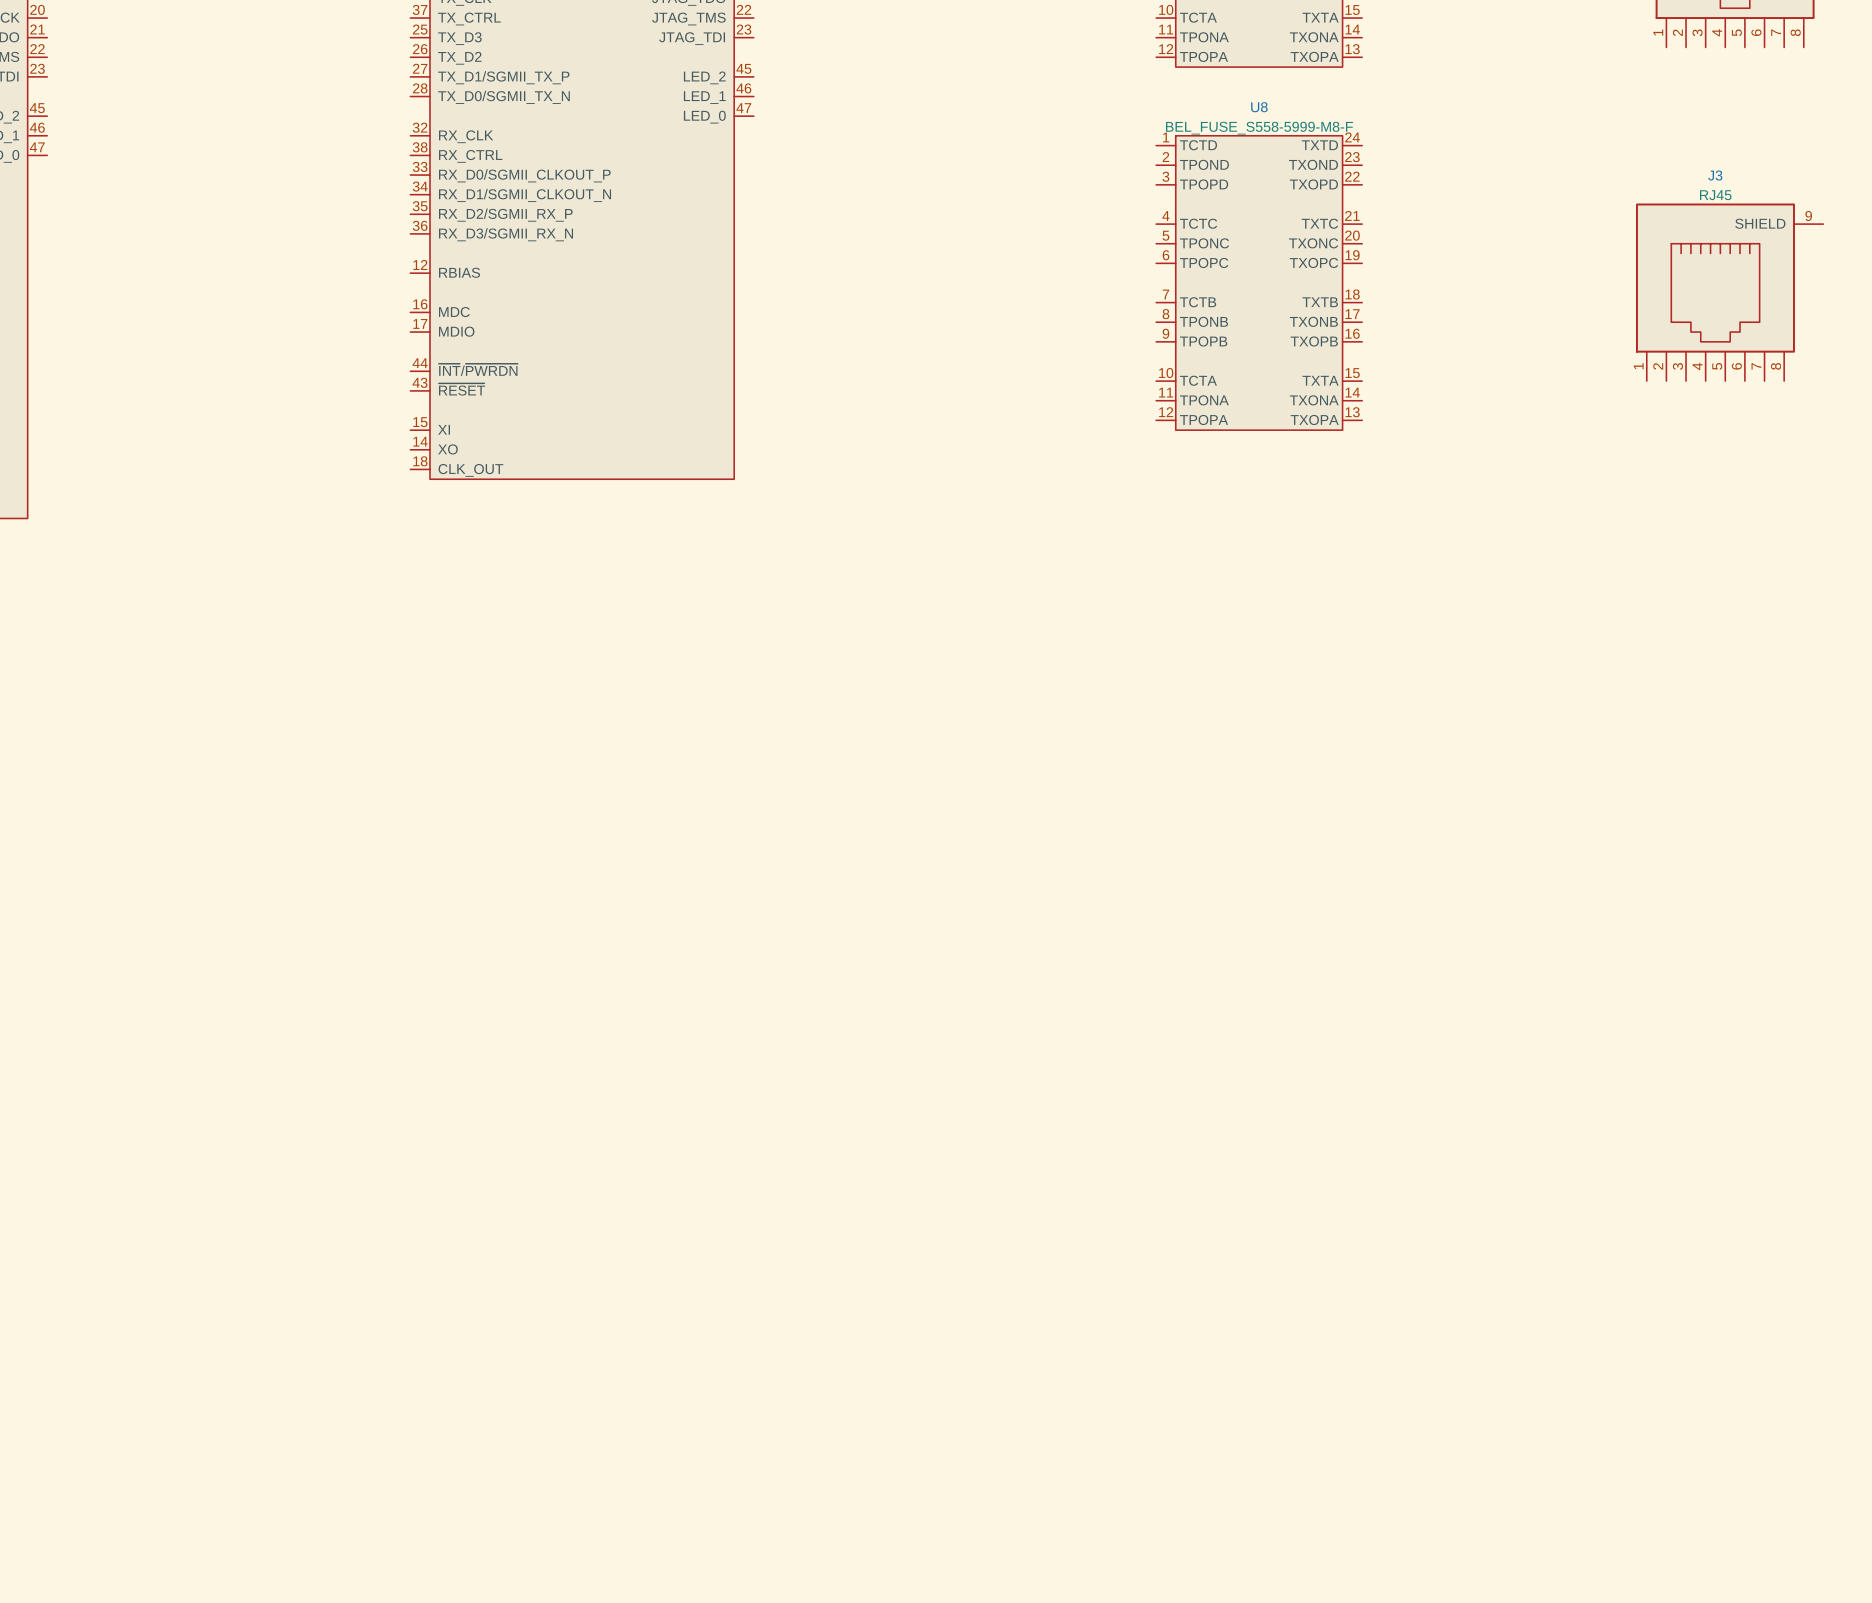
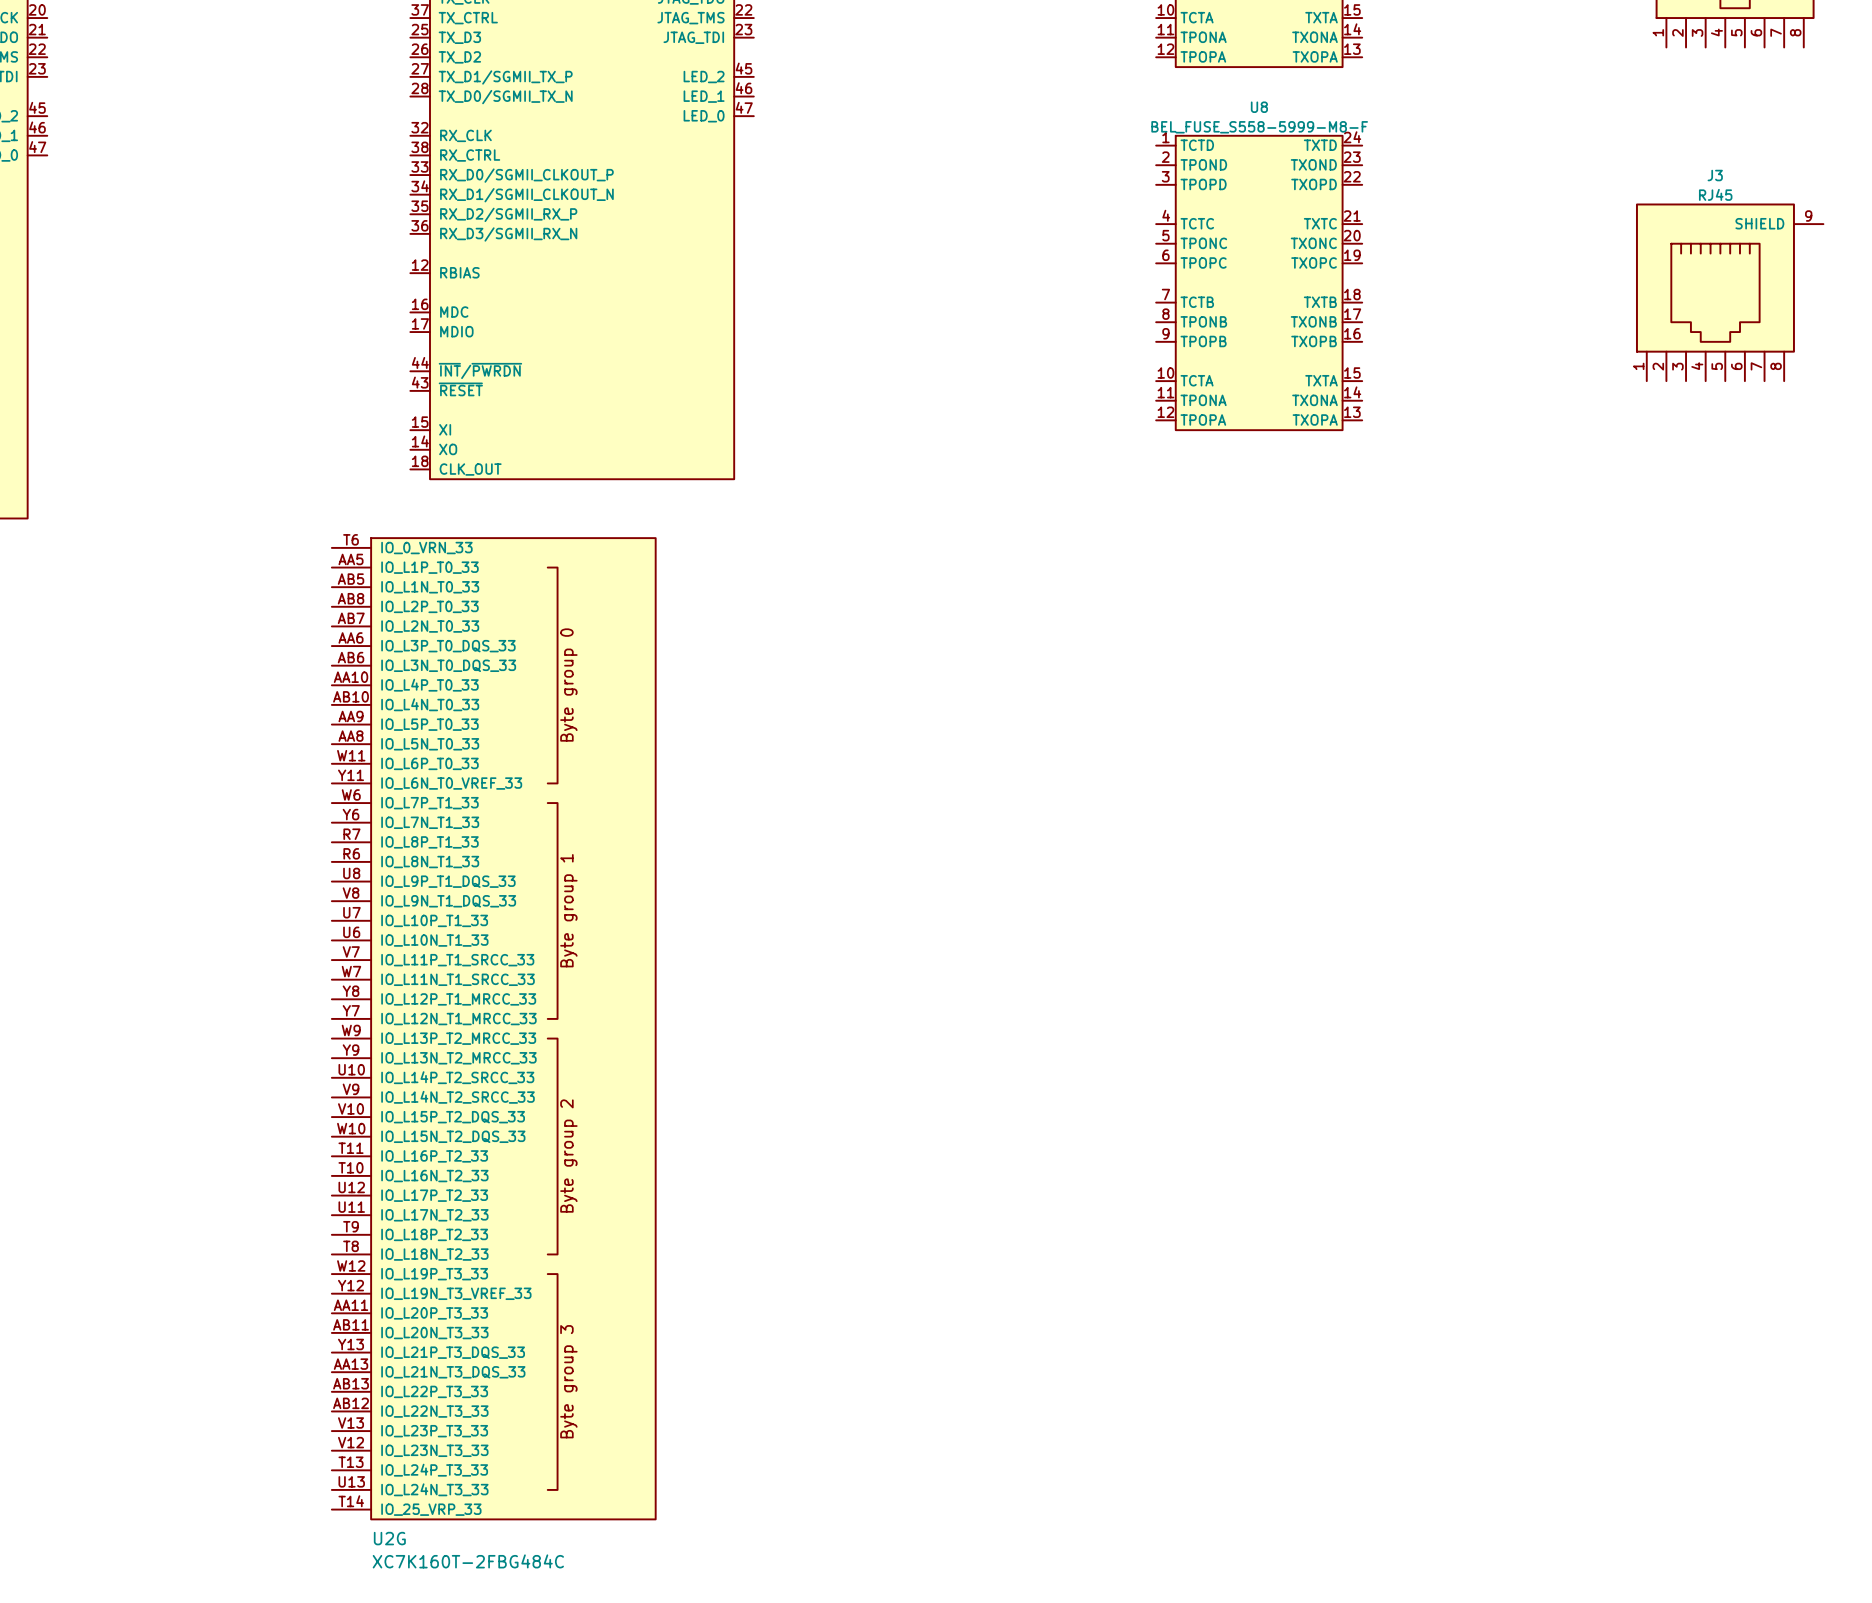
U2G: none -> XC7K160T-2FBG484C (493, 1028)

